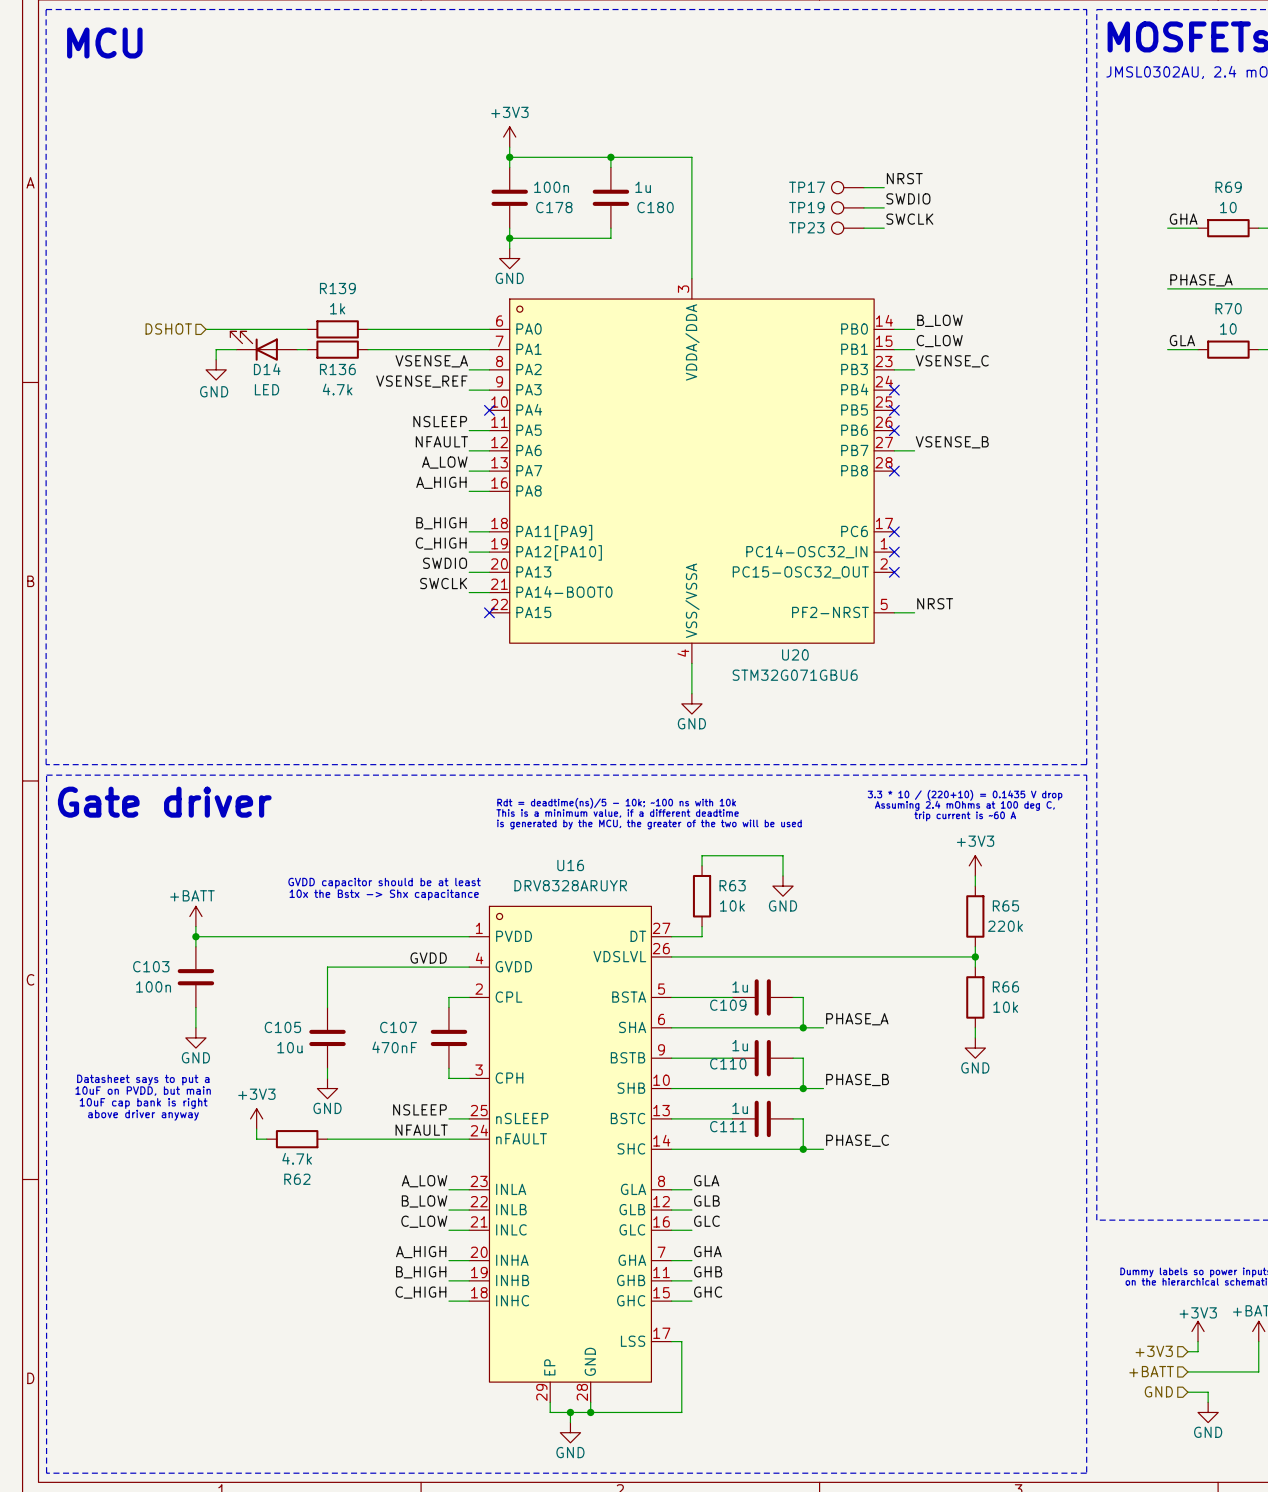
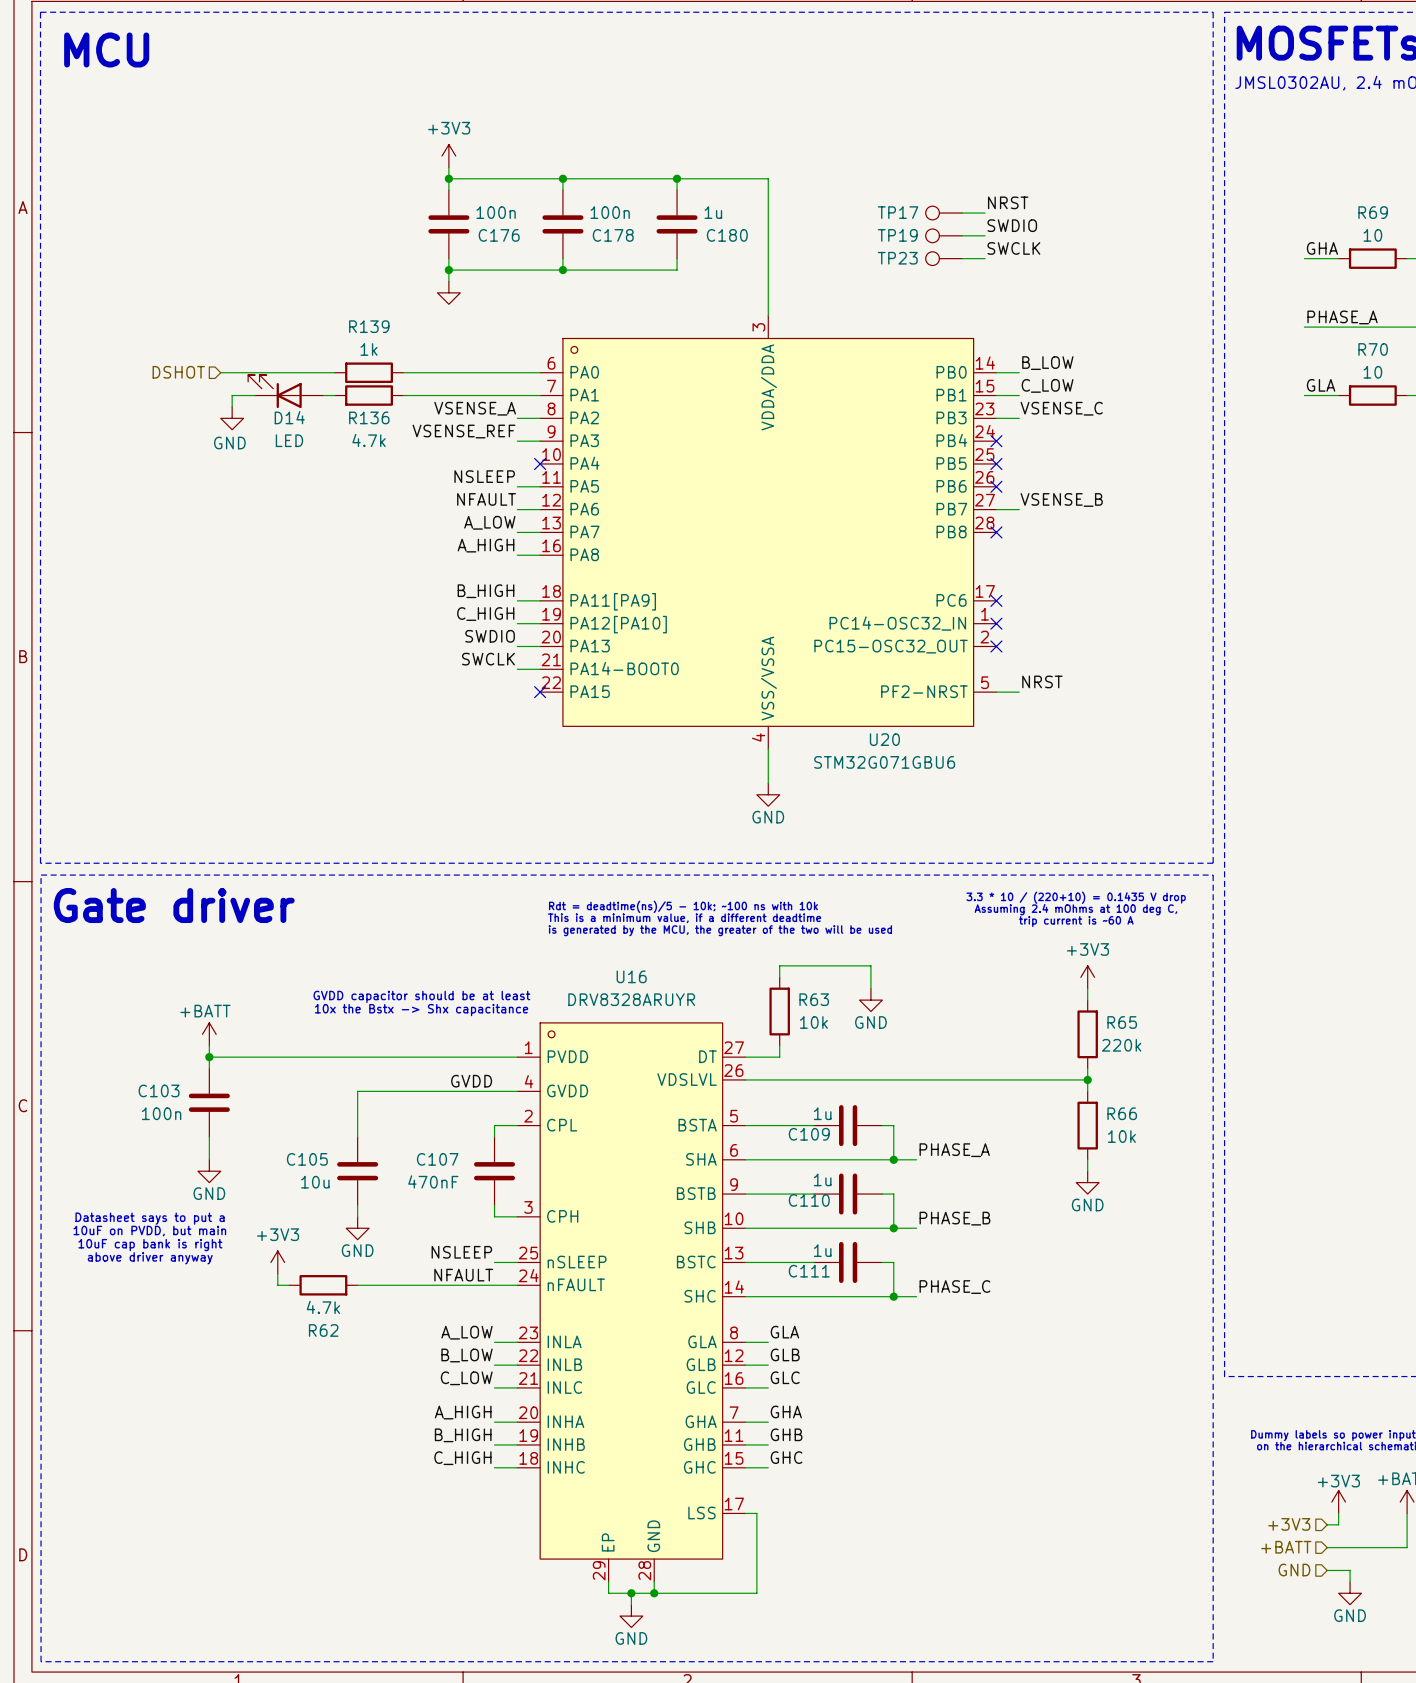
power symbol position: +3V3 (509, 137) -> +3V3 (448, 155)
wire: none -> (448, 167) (448, 190)
wire: (509, 147) (509, 157) -> (448, 178) (562, 178)
junction: none -> (448, 178)
C176: none -> 100n (448, 224)
wire: none -> (448, 258) (448, 281)
junction: none -> (448, 270)
wire: (509, 238) (509, 248) -> (562, 270) (448, 270)
power symbol: none -> (448, 292)
power symbol: GND (509, 258) -> none

